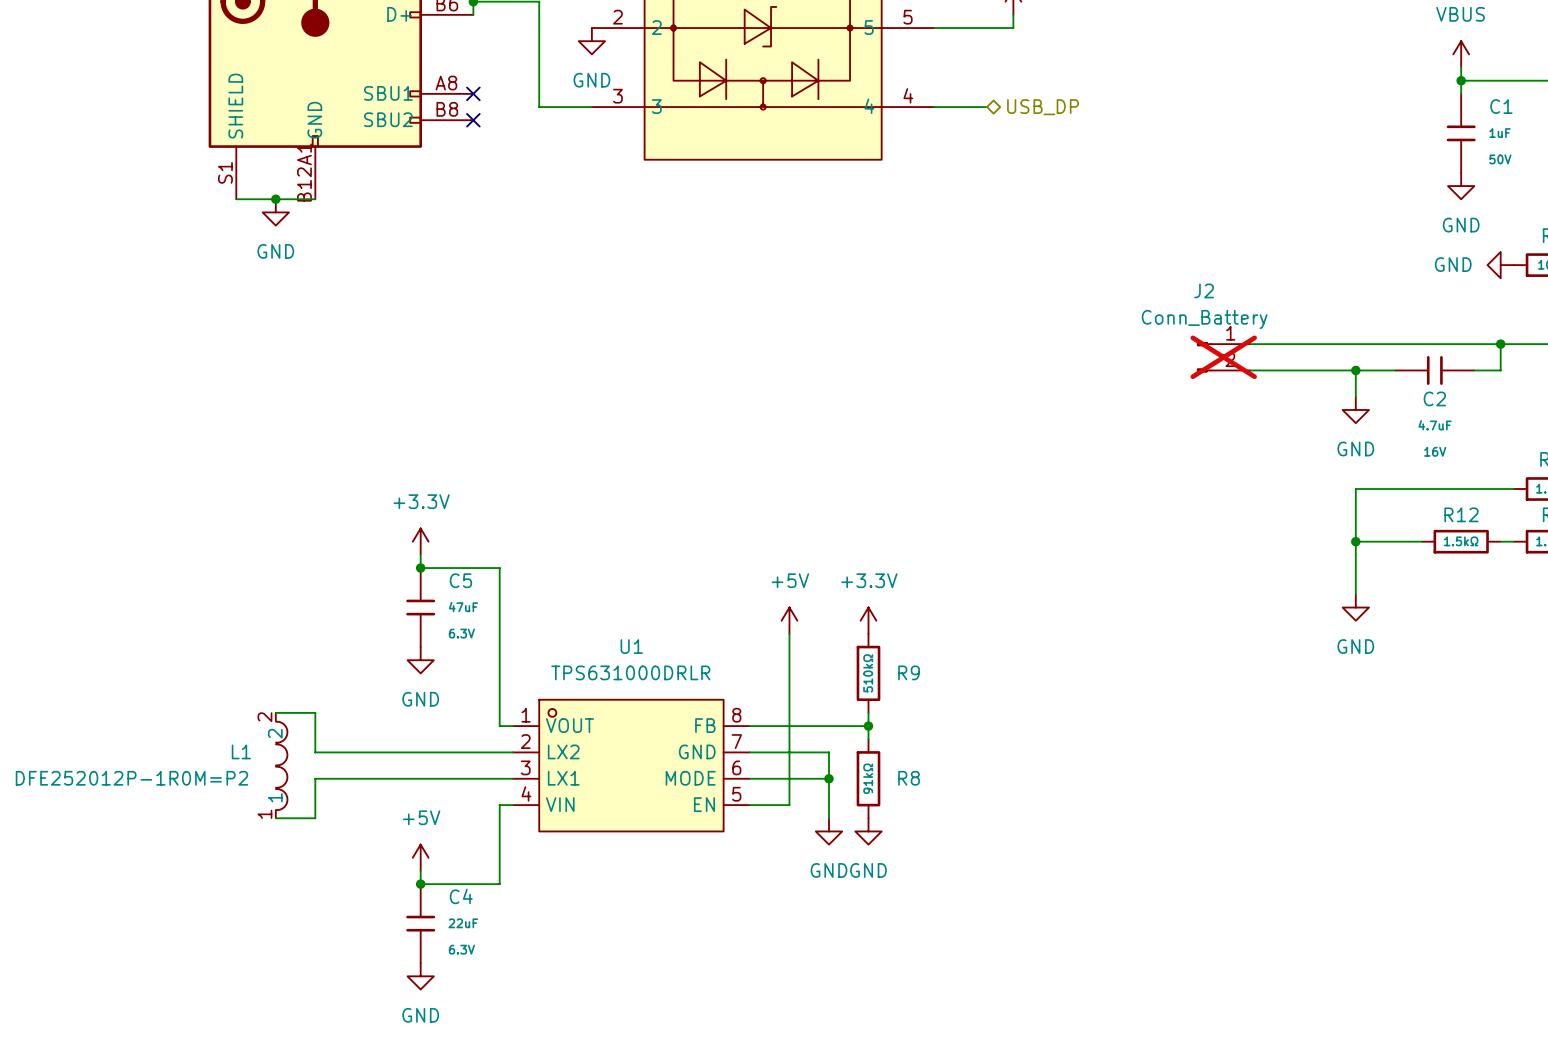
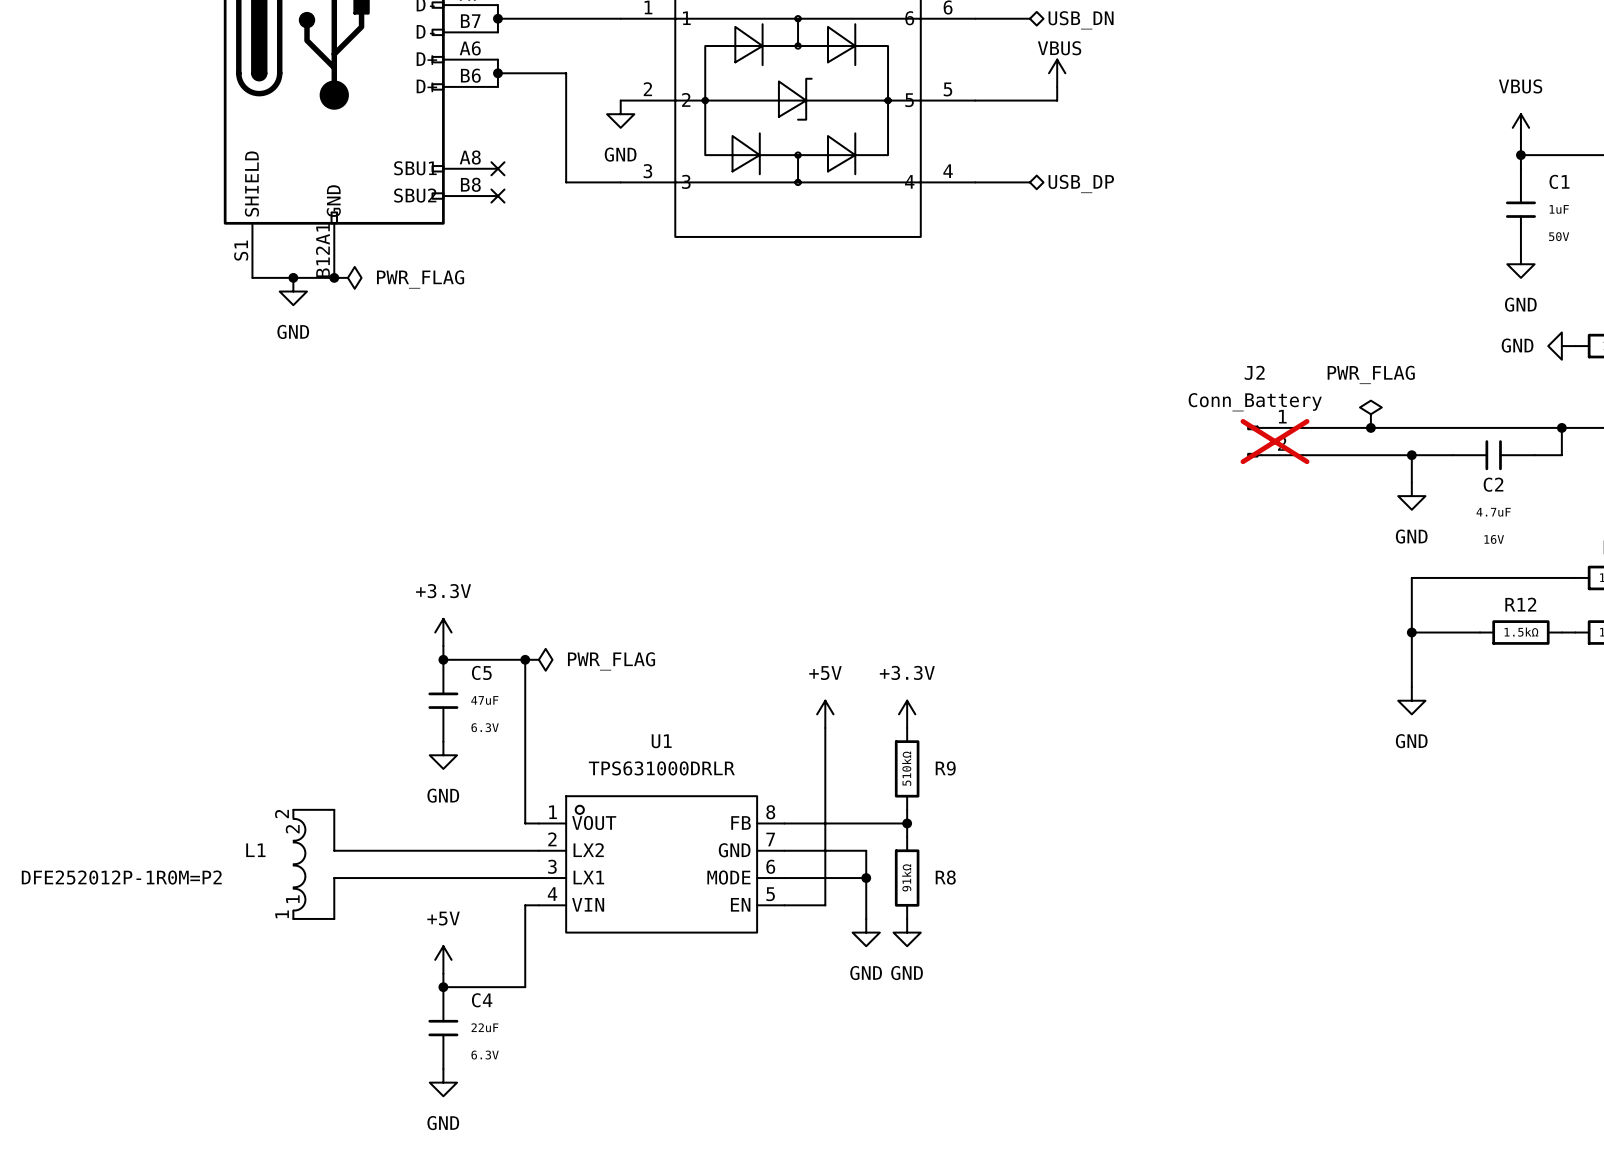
junction: none -> (334, 277)
power symbol: none -> PWR_FLAG (347, 277)
power symbol: none -> PWR_FLAG (1370, 414)
junction: none -> (1370, 427)
junction: none -> (525, 659)
power symbol: none -> PWR_FLAG (538, 659)

